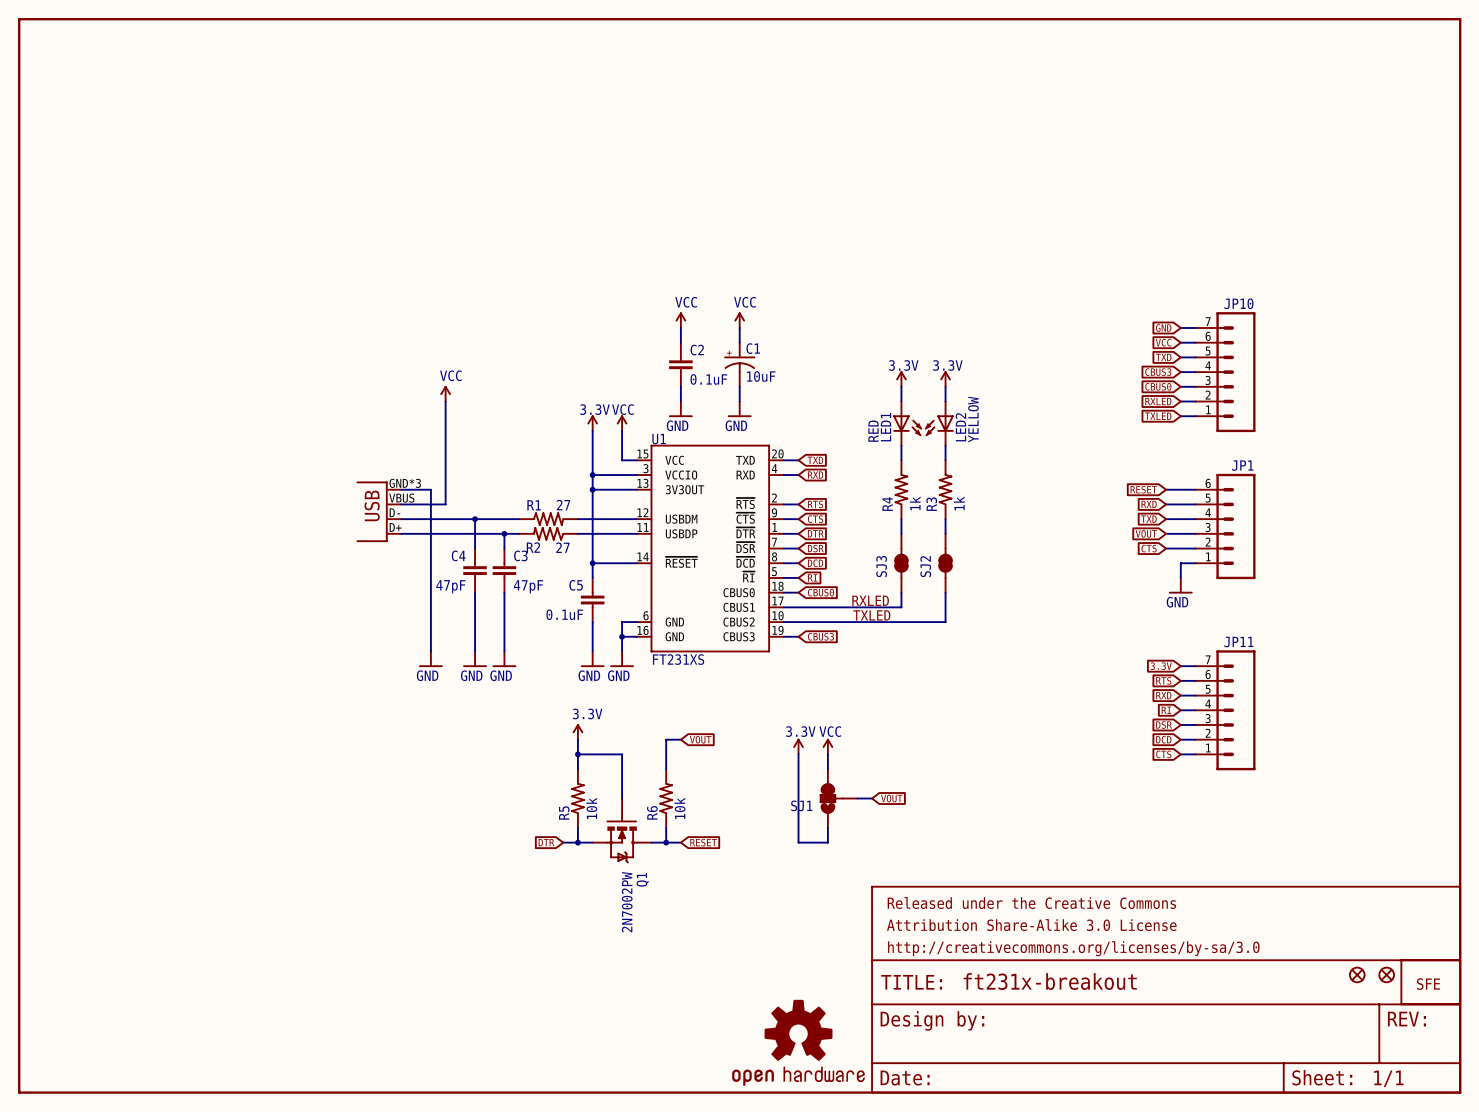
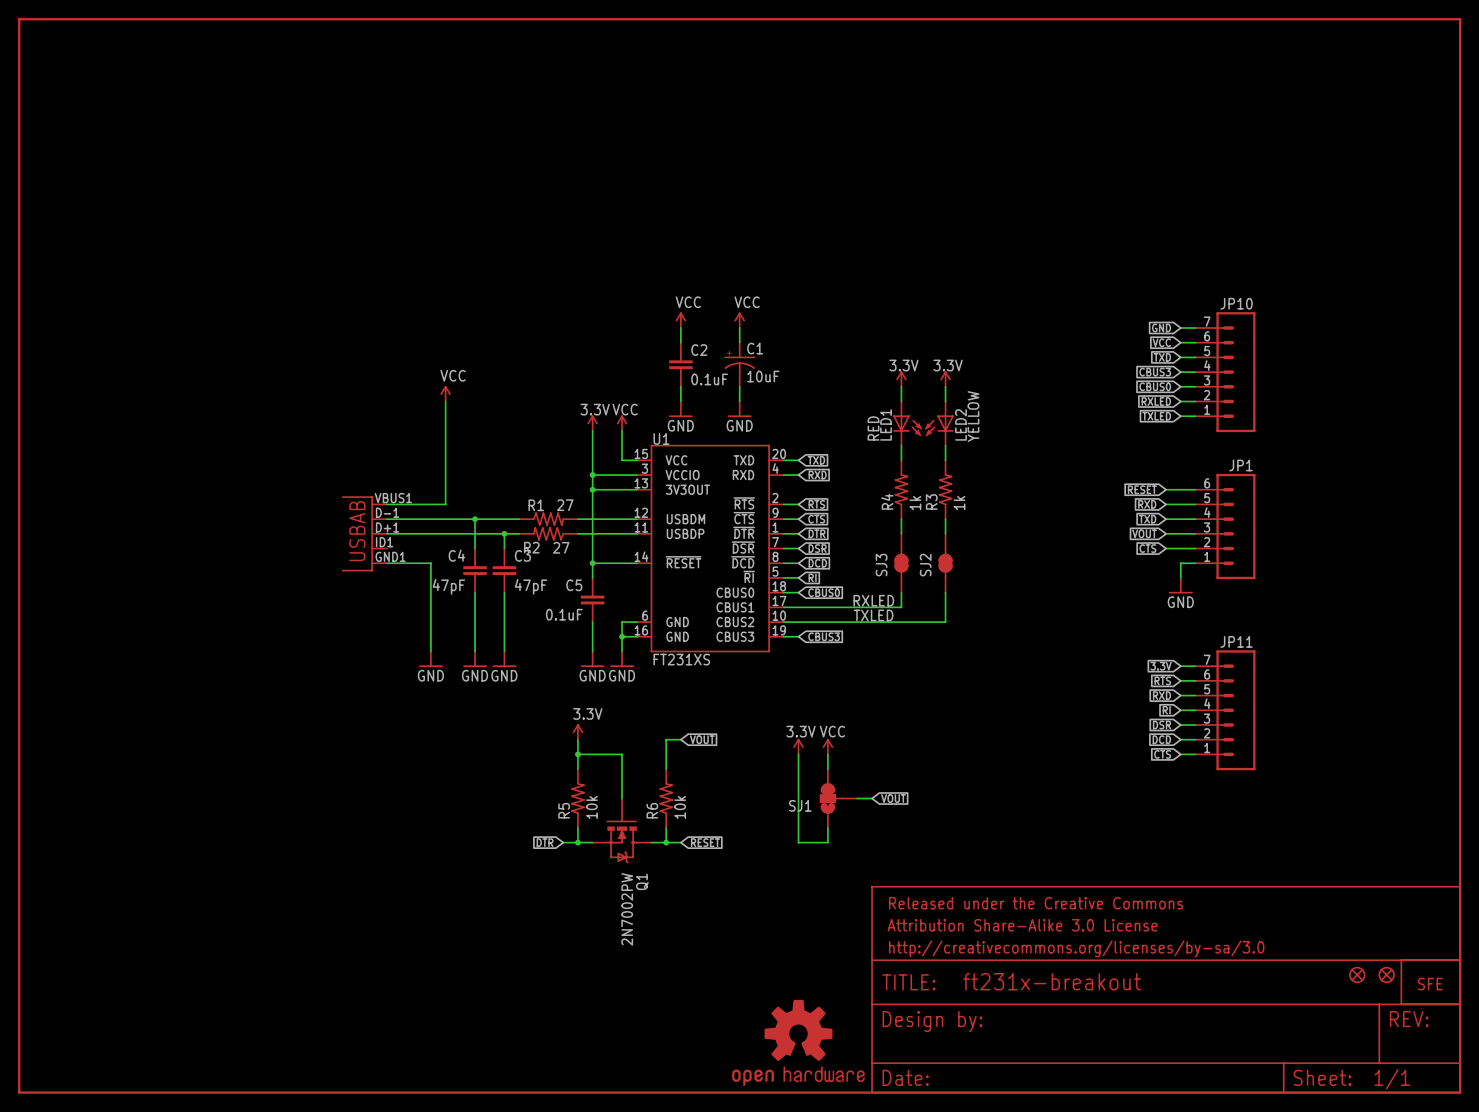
wire: (401, 489) (430, 489) (430, 563) -> (386, 563) (430, 563)
part: (379, 511) -> none
part: none -> (364, 533)

